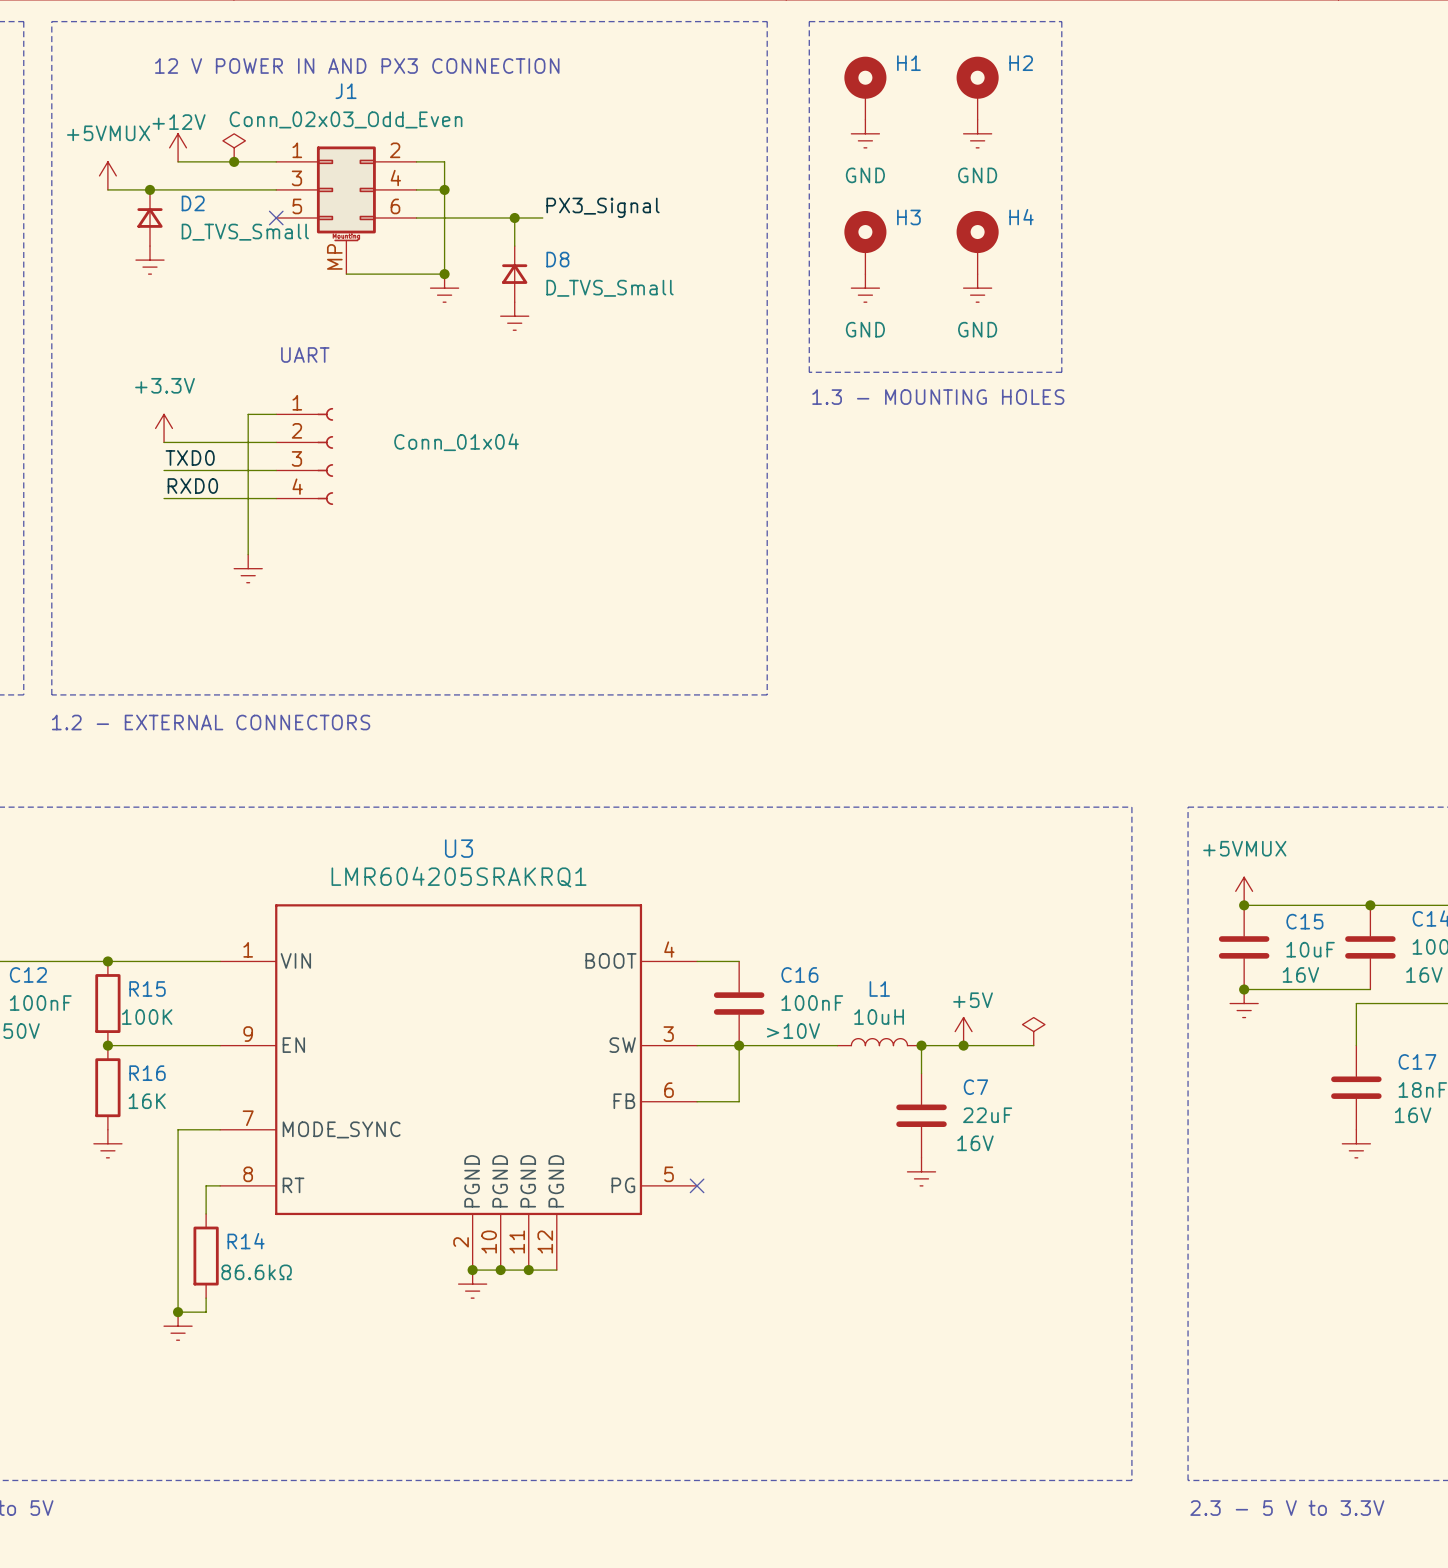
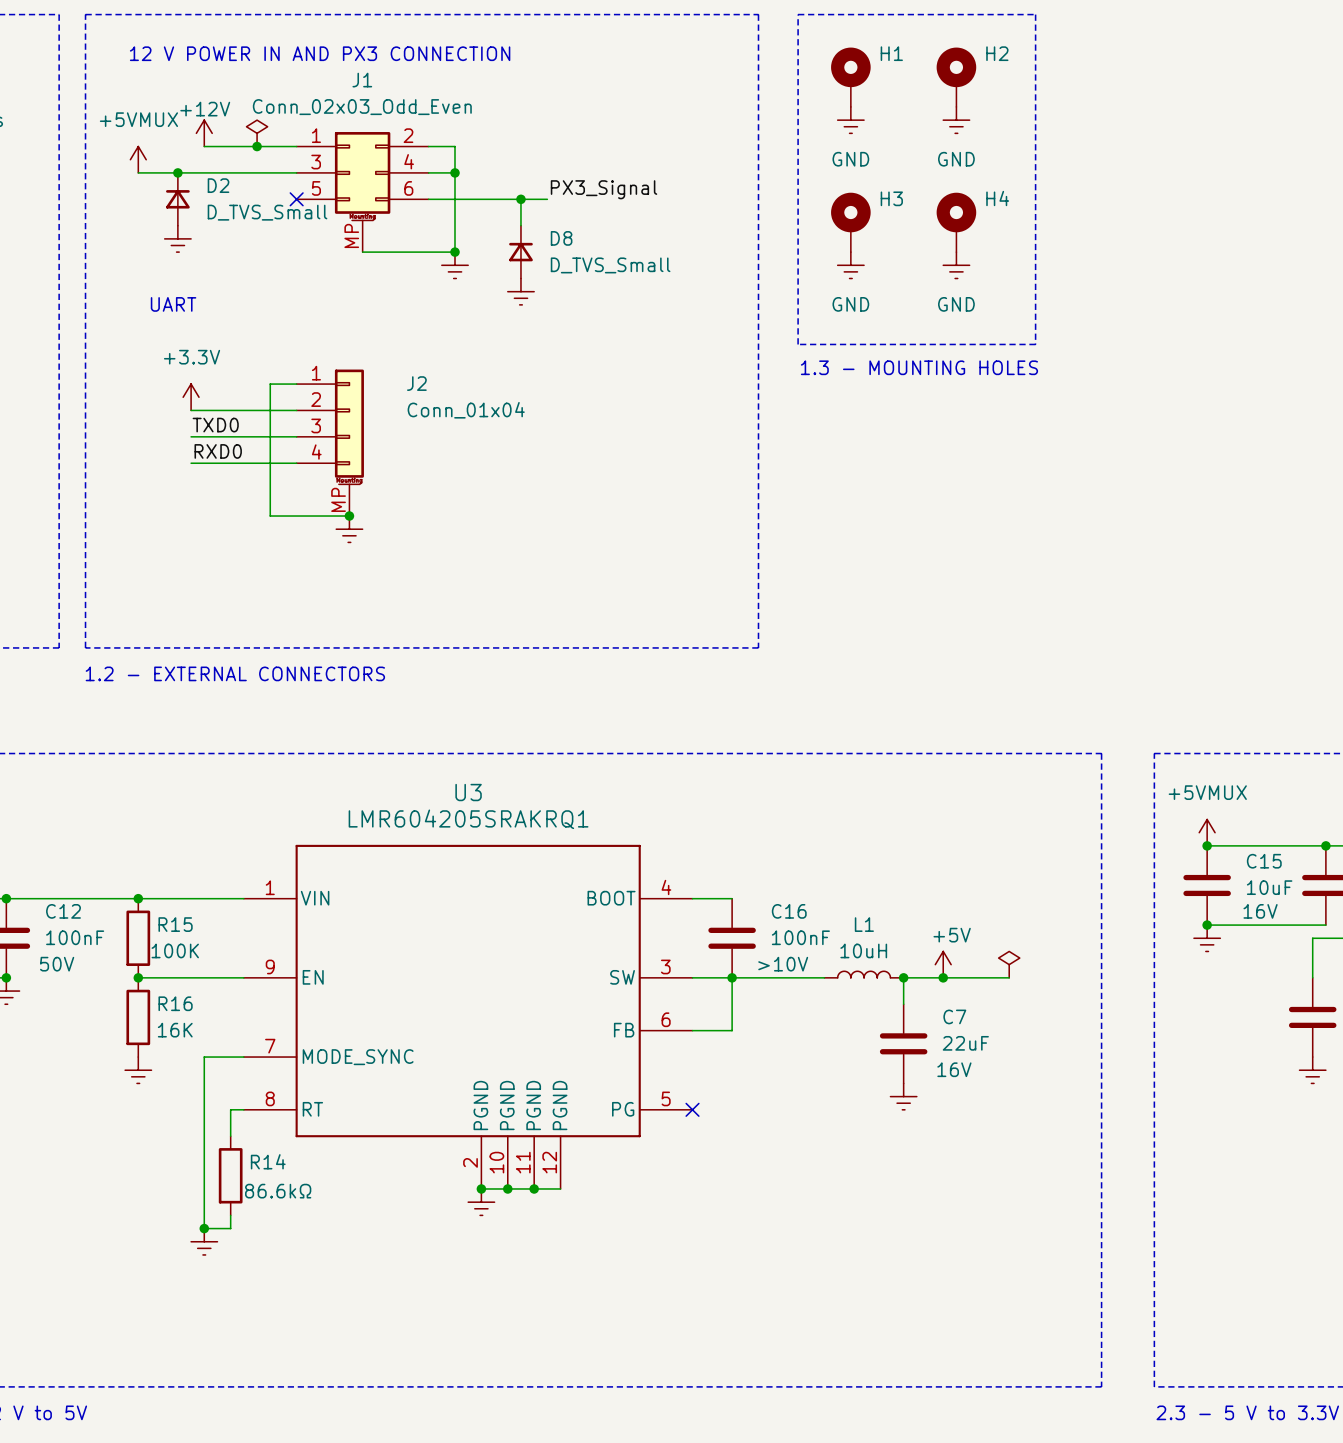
text position: 12 V POWER IN AND PX3 CONNECTION (357, 66) -> 12 V POWER IN AND PX3 CONNECTION (320, 53)
text position: UART (305, 354) -> UART (173, 304)
part: Conn_01x04 (304, 456) -> none
J2: none -> Conn_01x04 (330, 442)
wire: none -> (270, 516) (349, 516)
junction: none -> (349, 516)
power symbol position: (248, 568) -> (349, 529)

